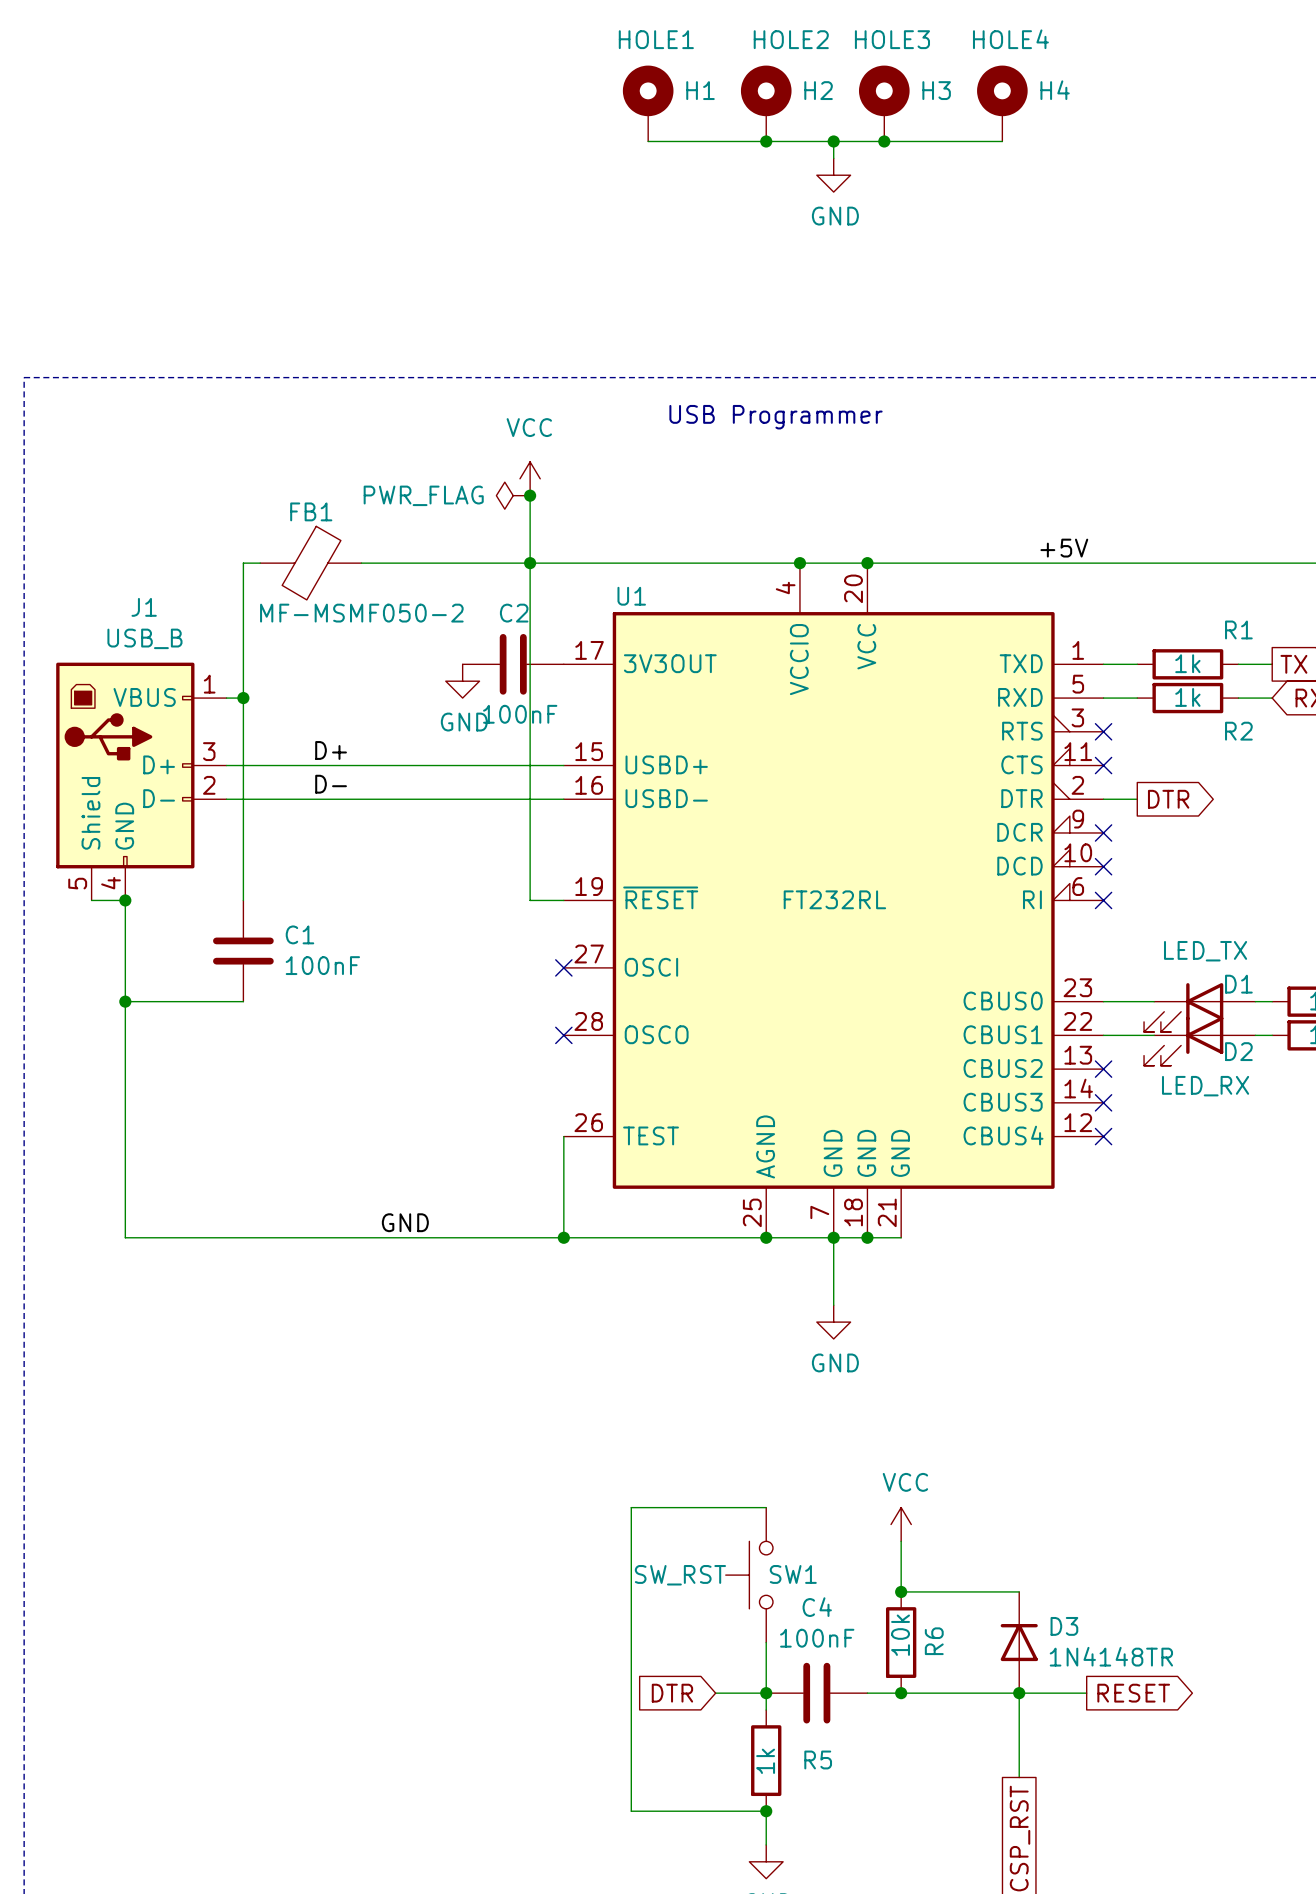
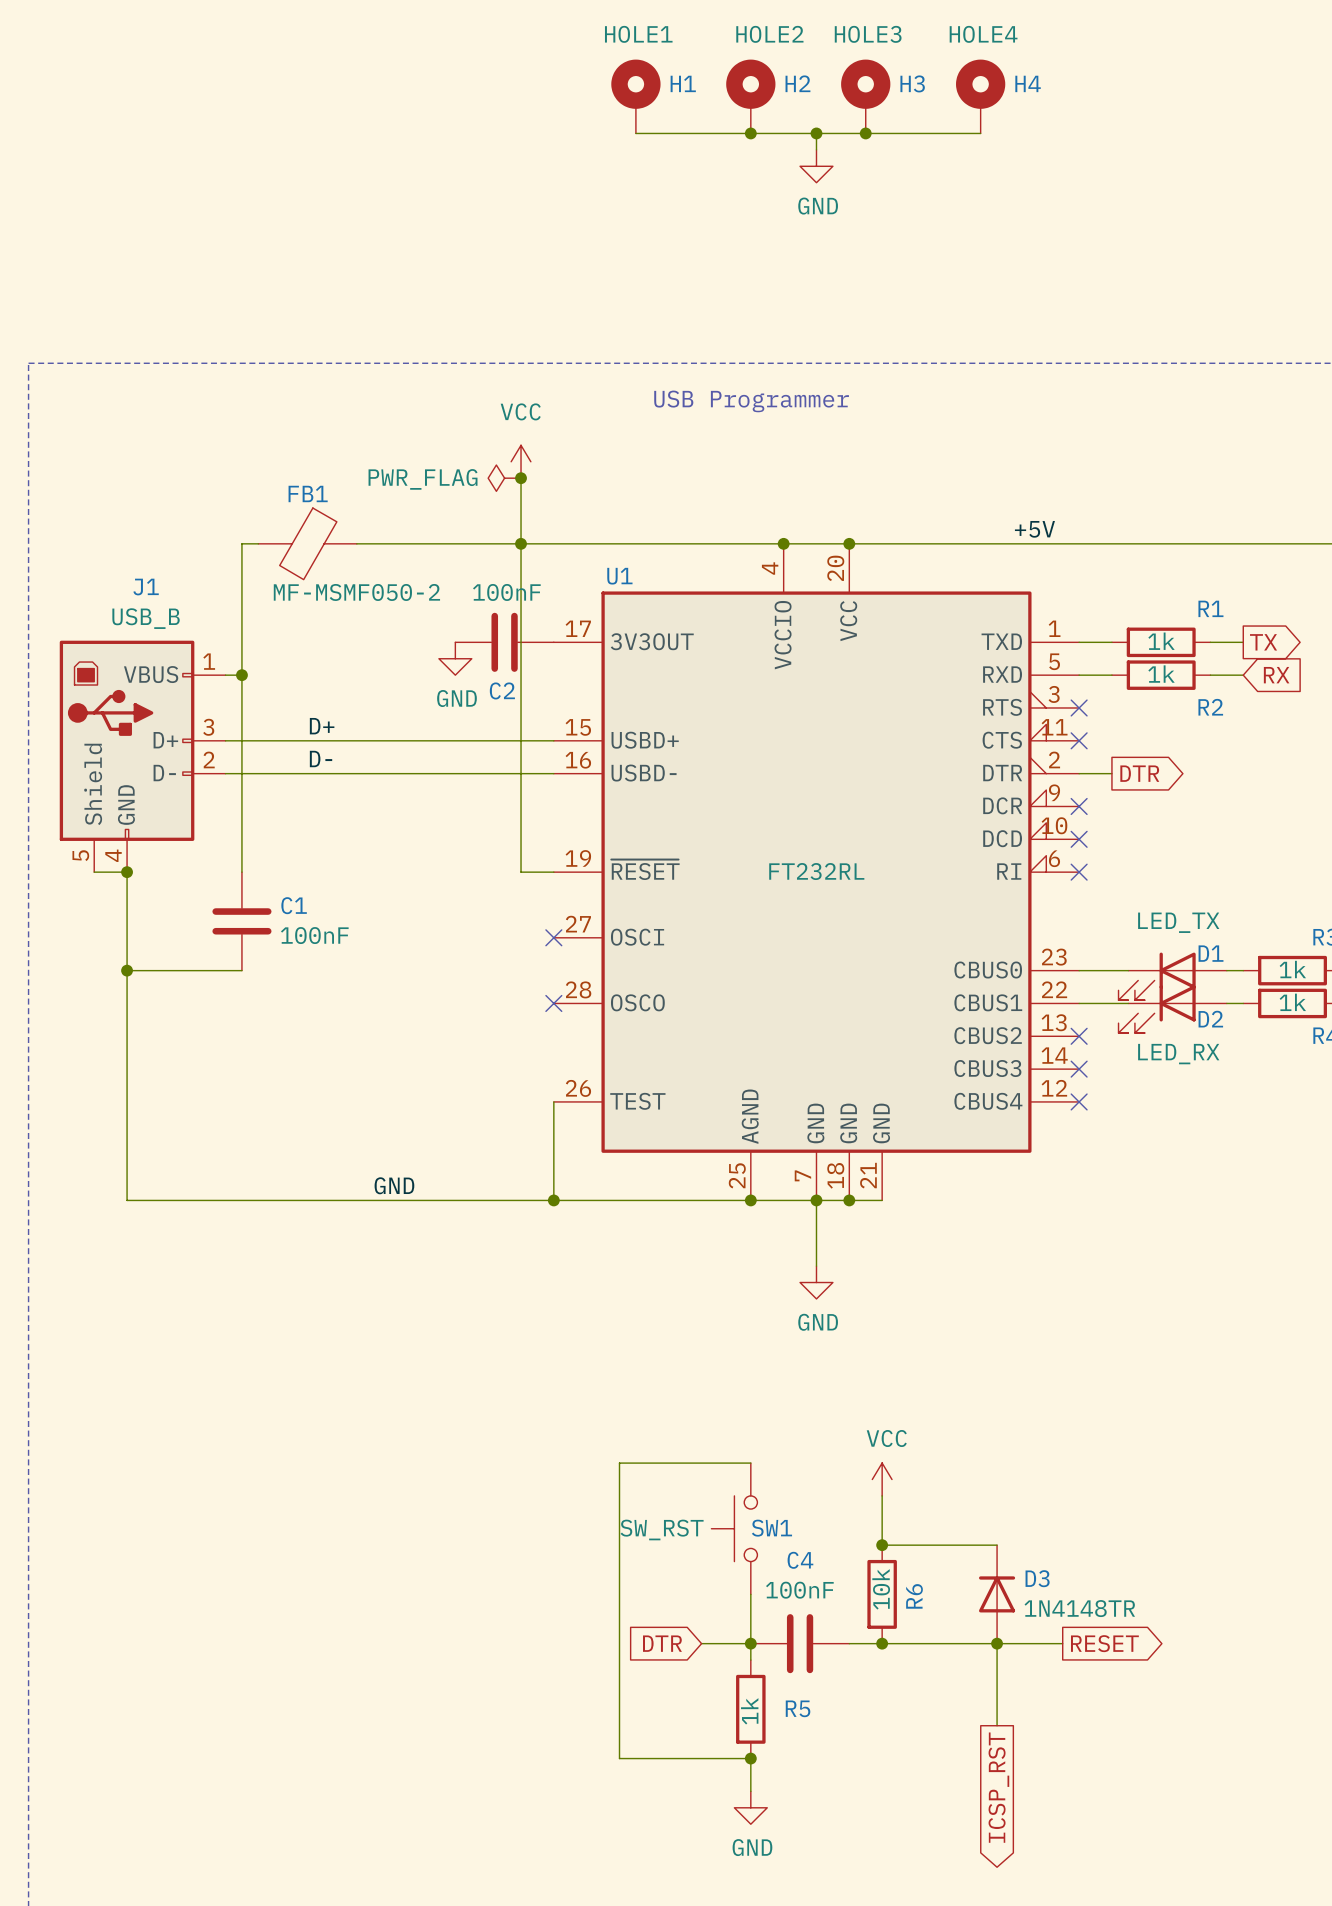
C2 name position: C2 (514, 613) -> C2 (502, 690)
C2 value position: 100nF (520, 714) -> 100nF (506, 592)

